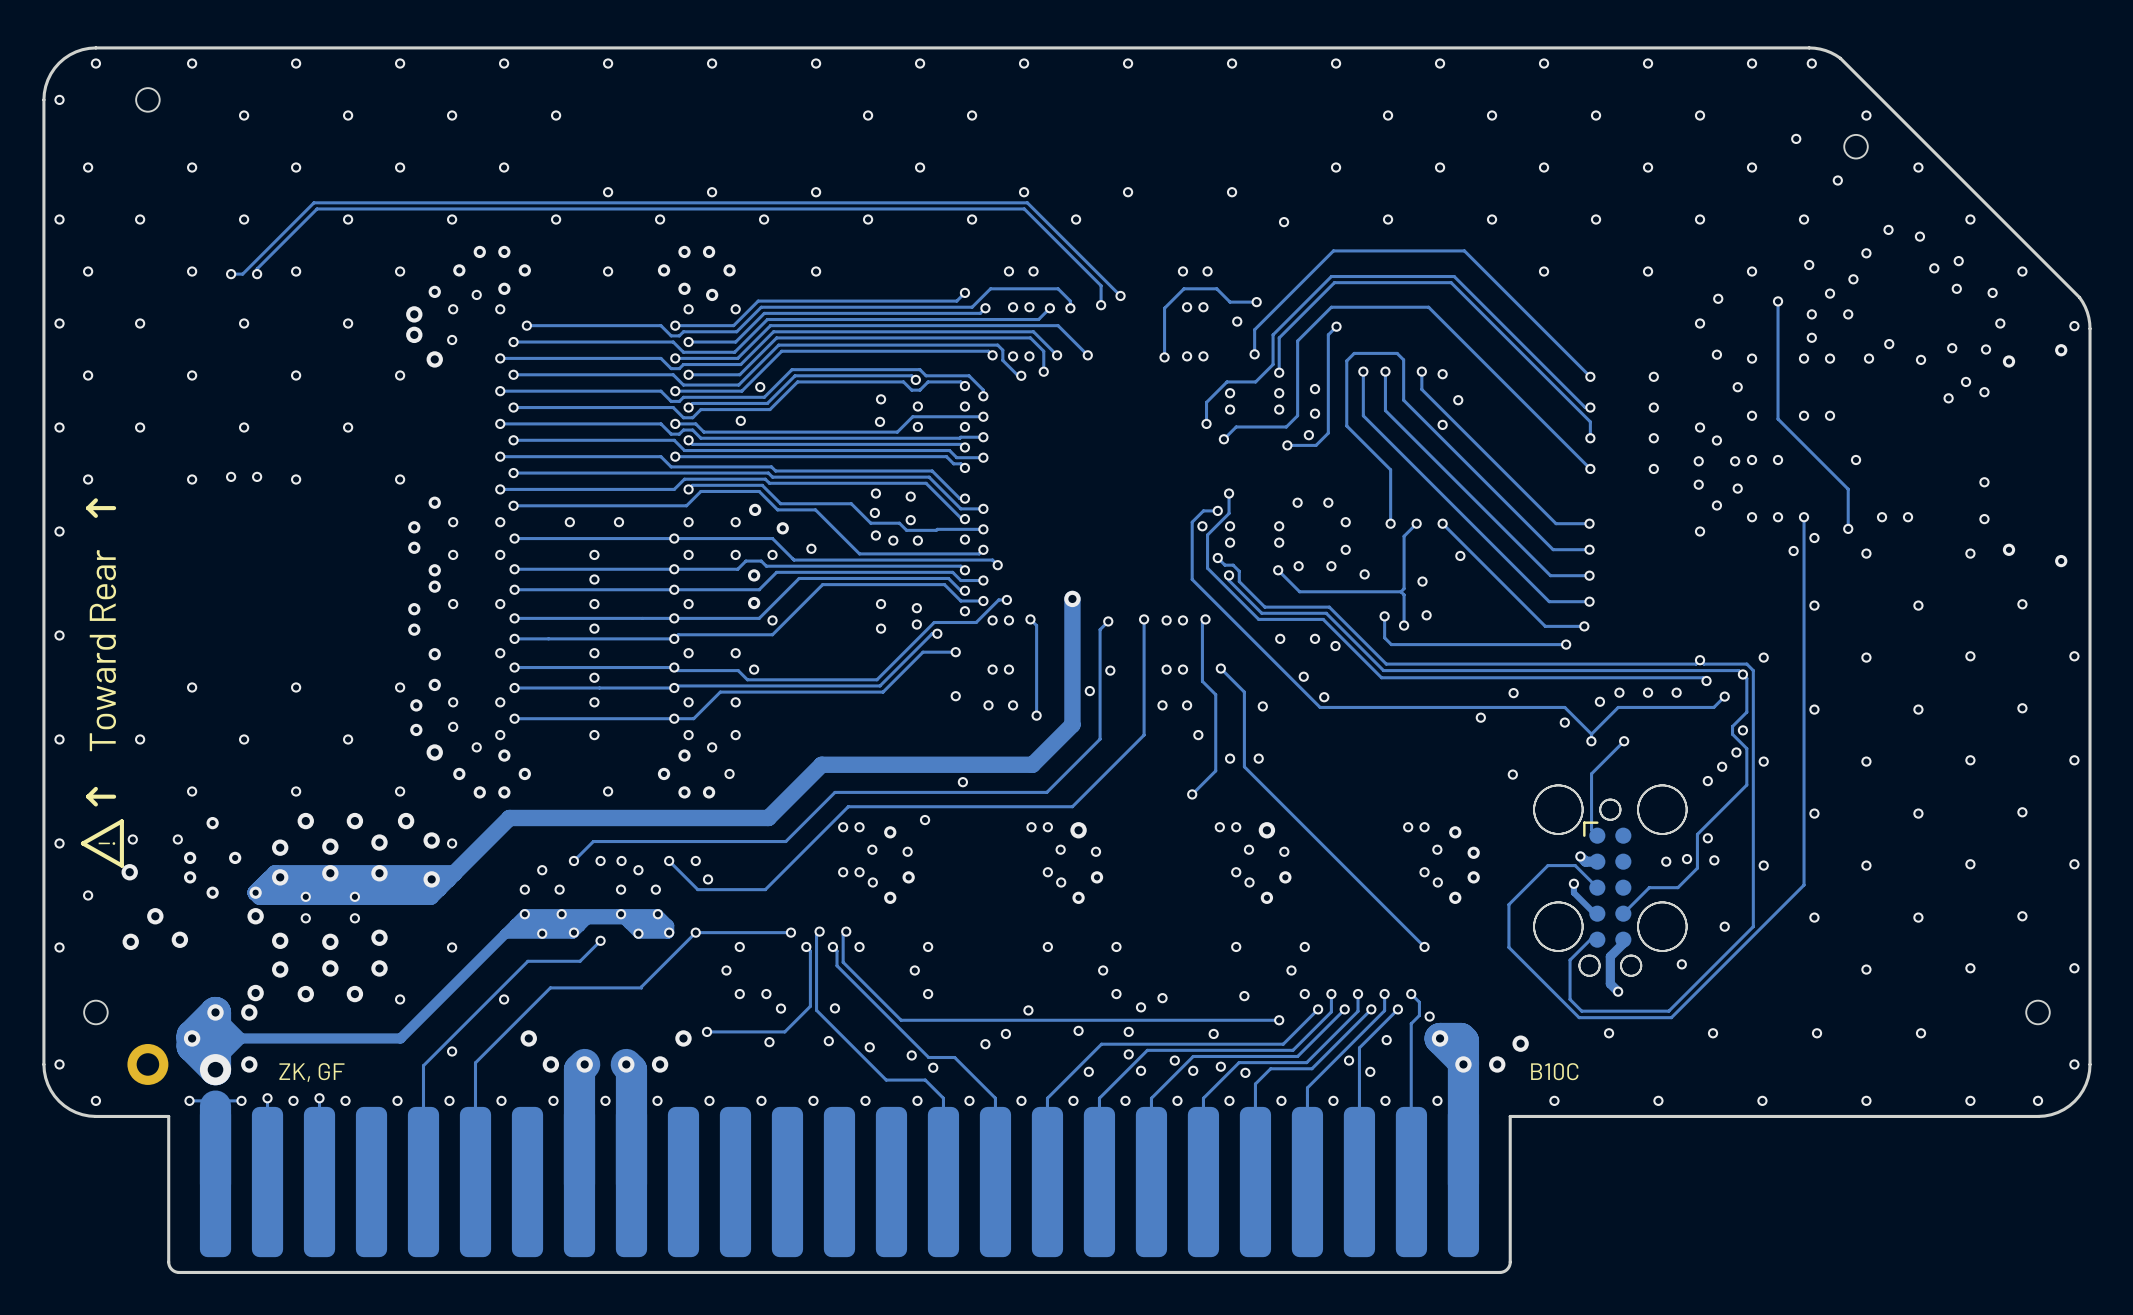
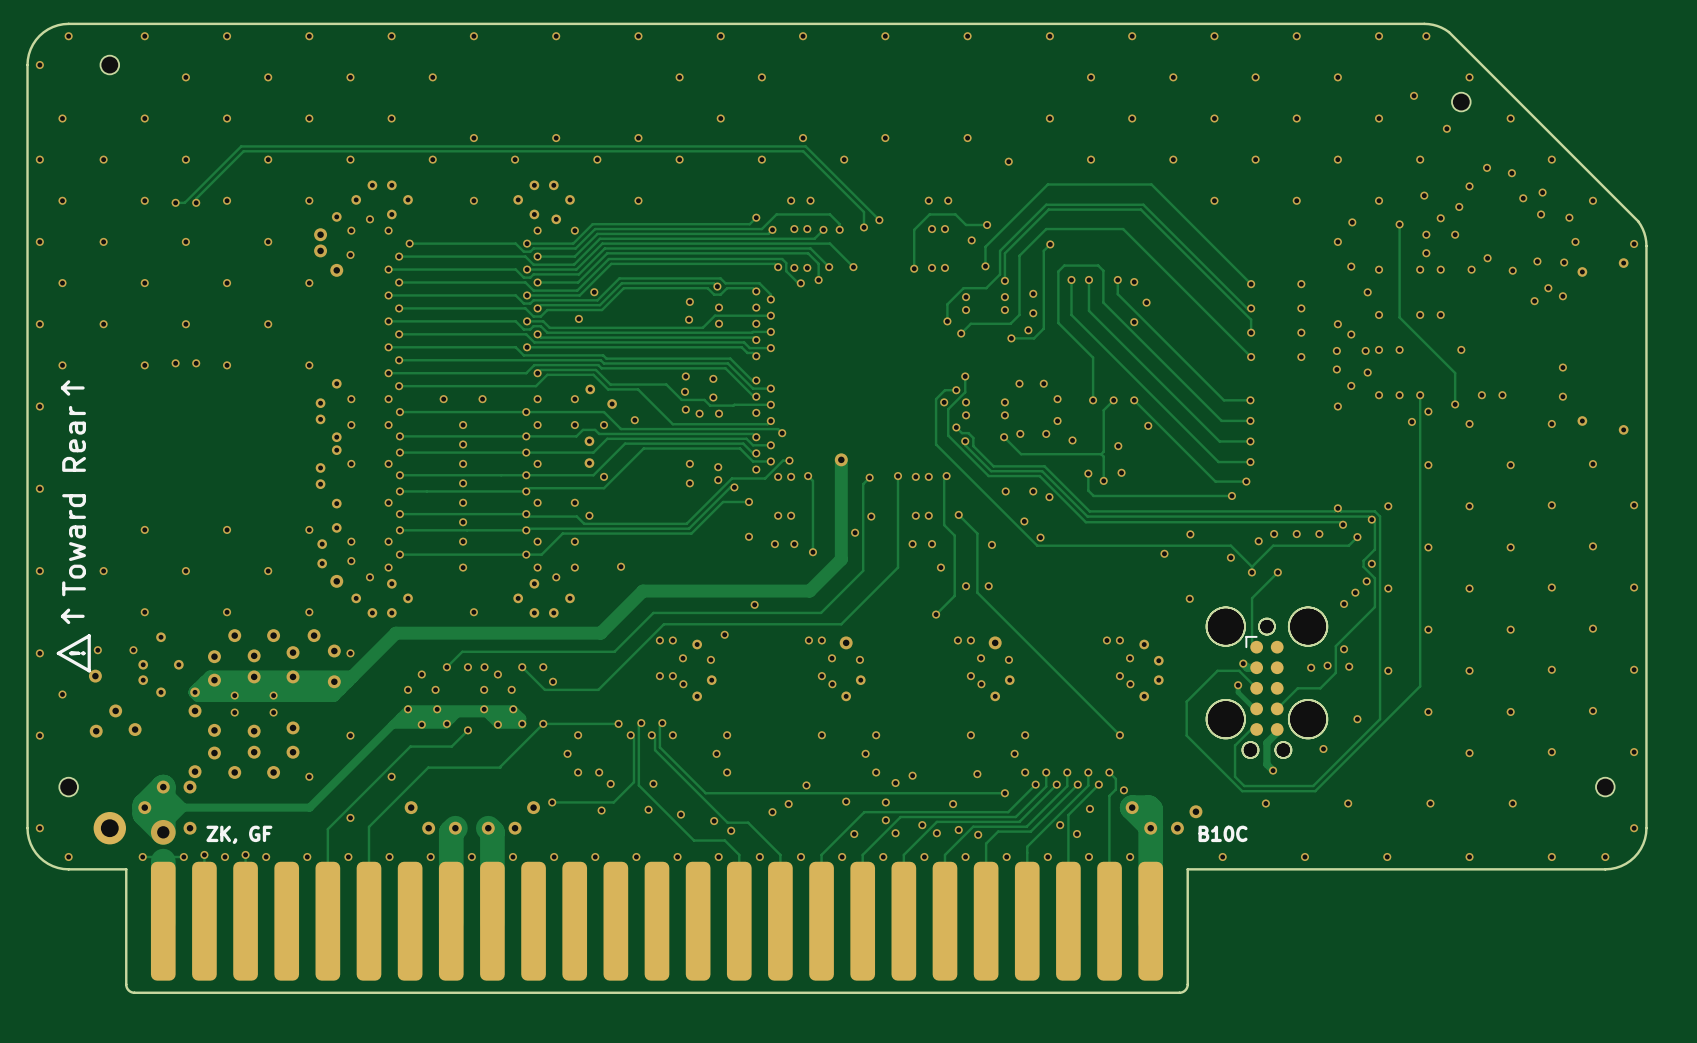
via position: (729, 773) -> (621, 566)
via: none -> (570, 598)

